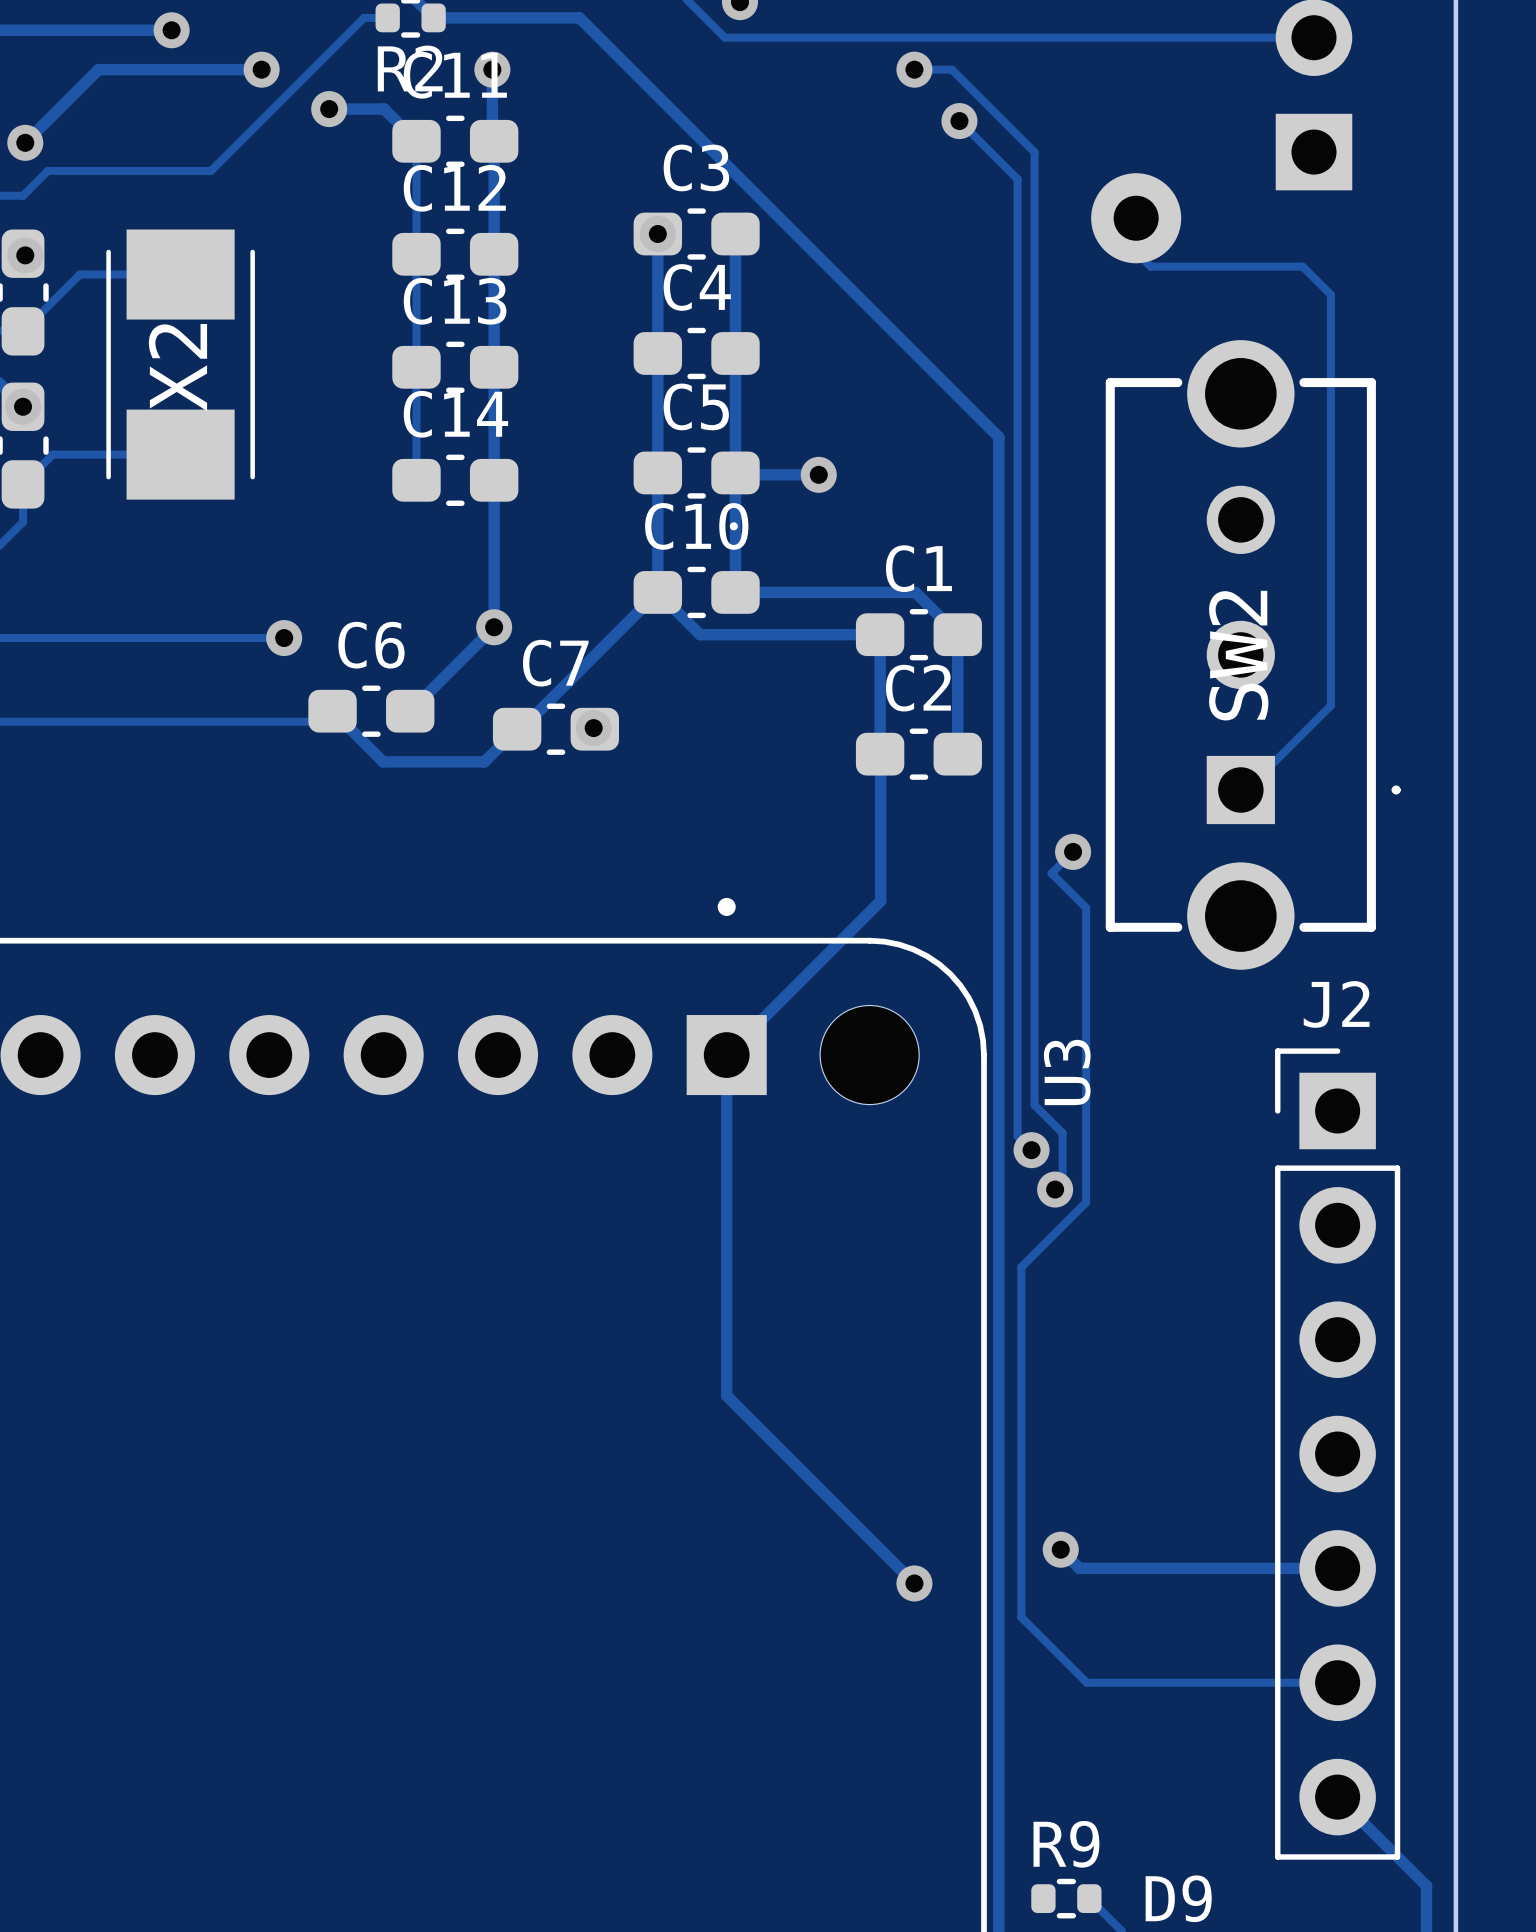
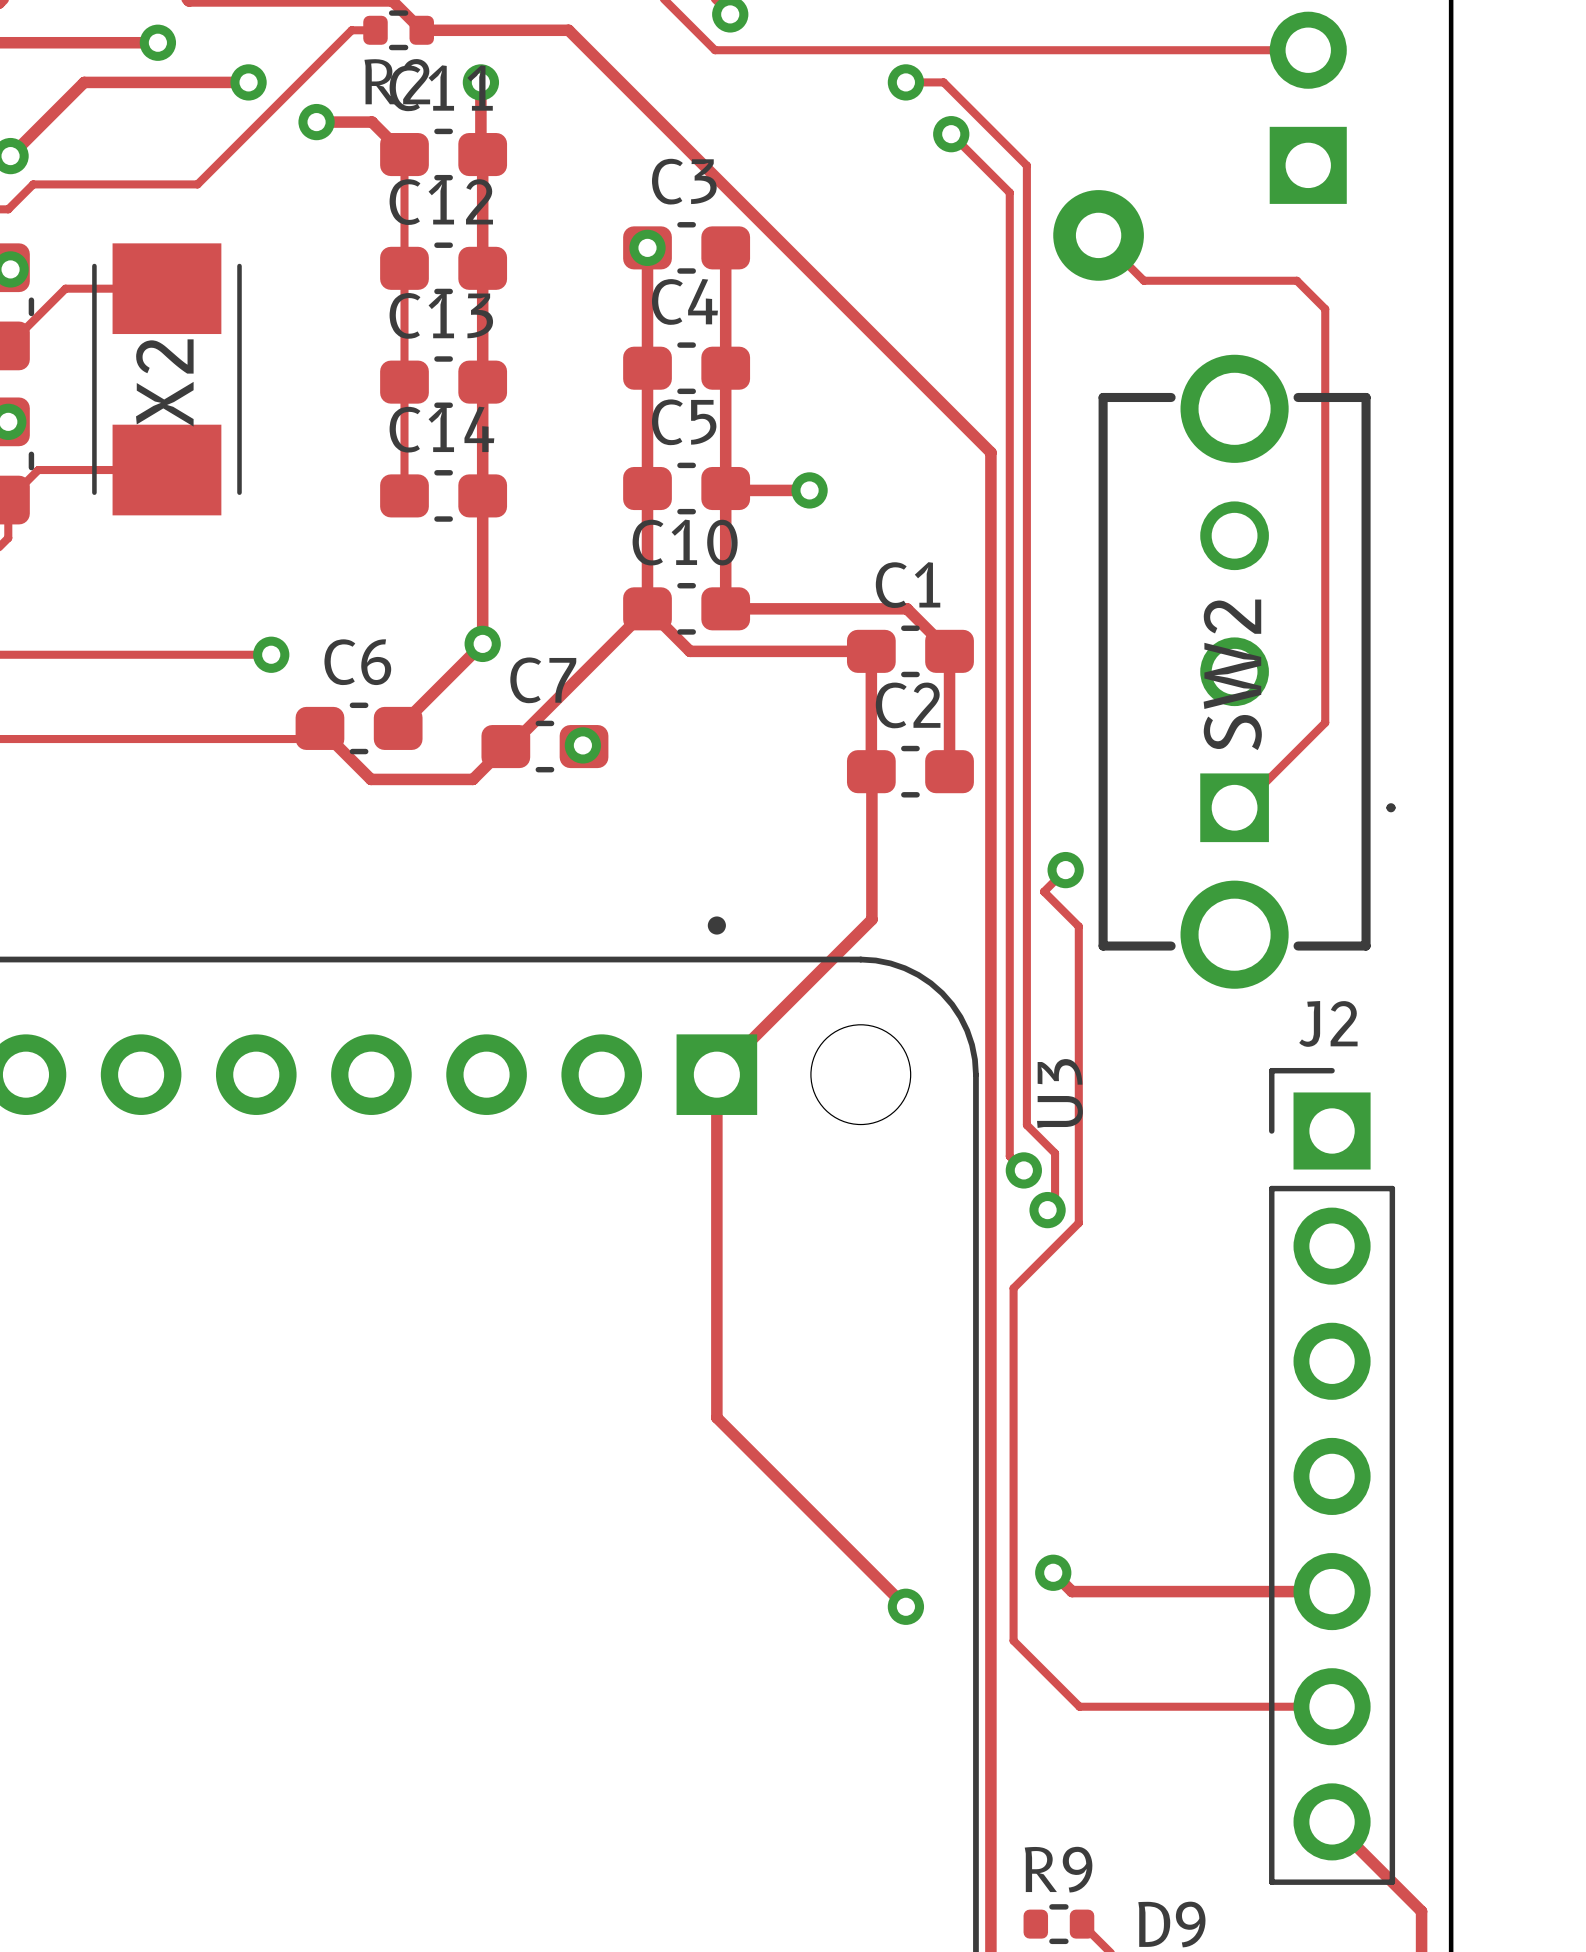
part position: (1136, 218) -> (1098, 235)

